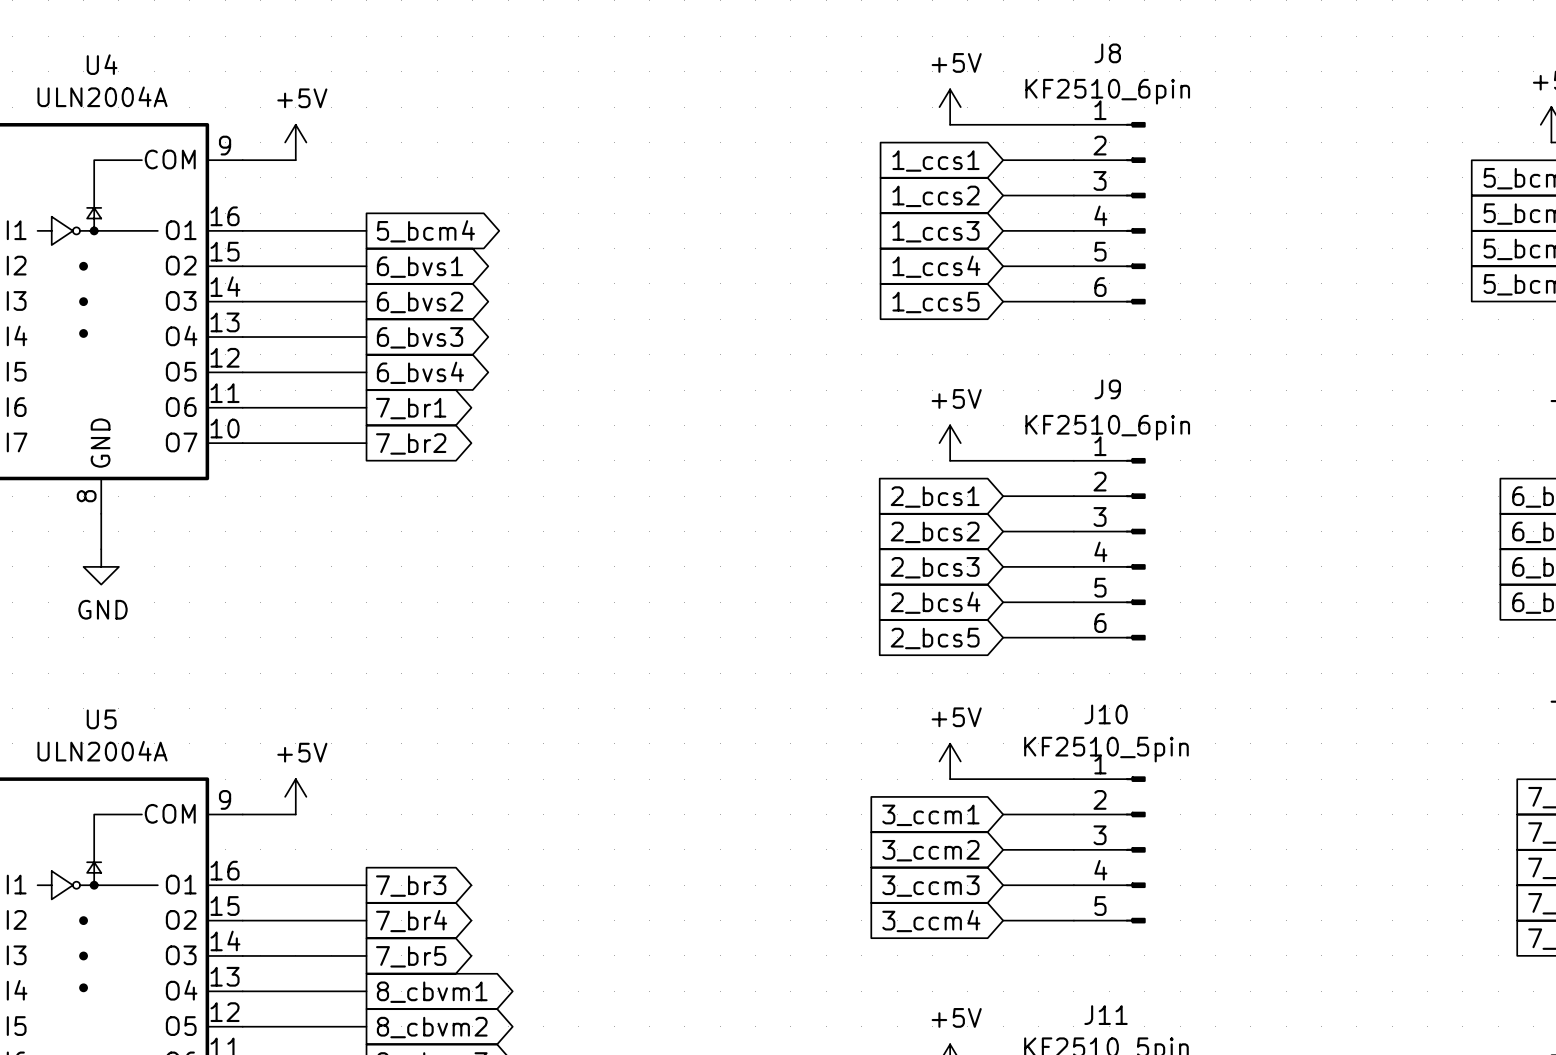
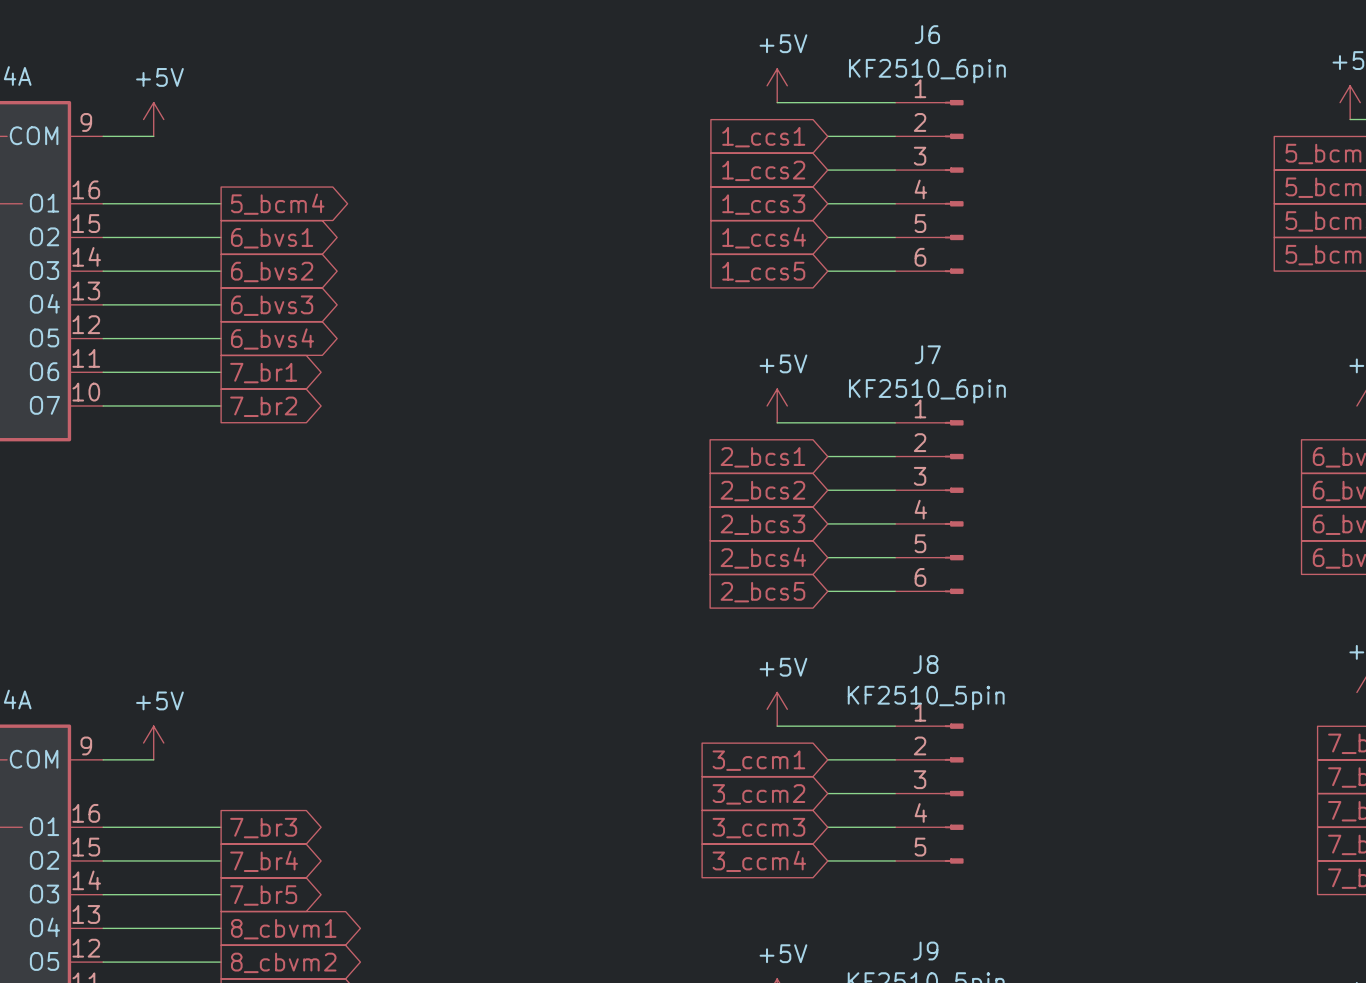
J8 name: J8 (1107, 53) -> J6 (927, 34)
J9 name: J9 (1107, 389) -> J7 (927, 354)
J10 name: J10 (1106, 714) -> J8 (925, 664)
J11 name: J11 (1106, 1015) -> J9 (925, 951)

